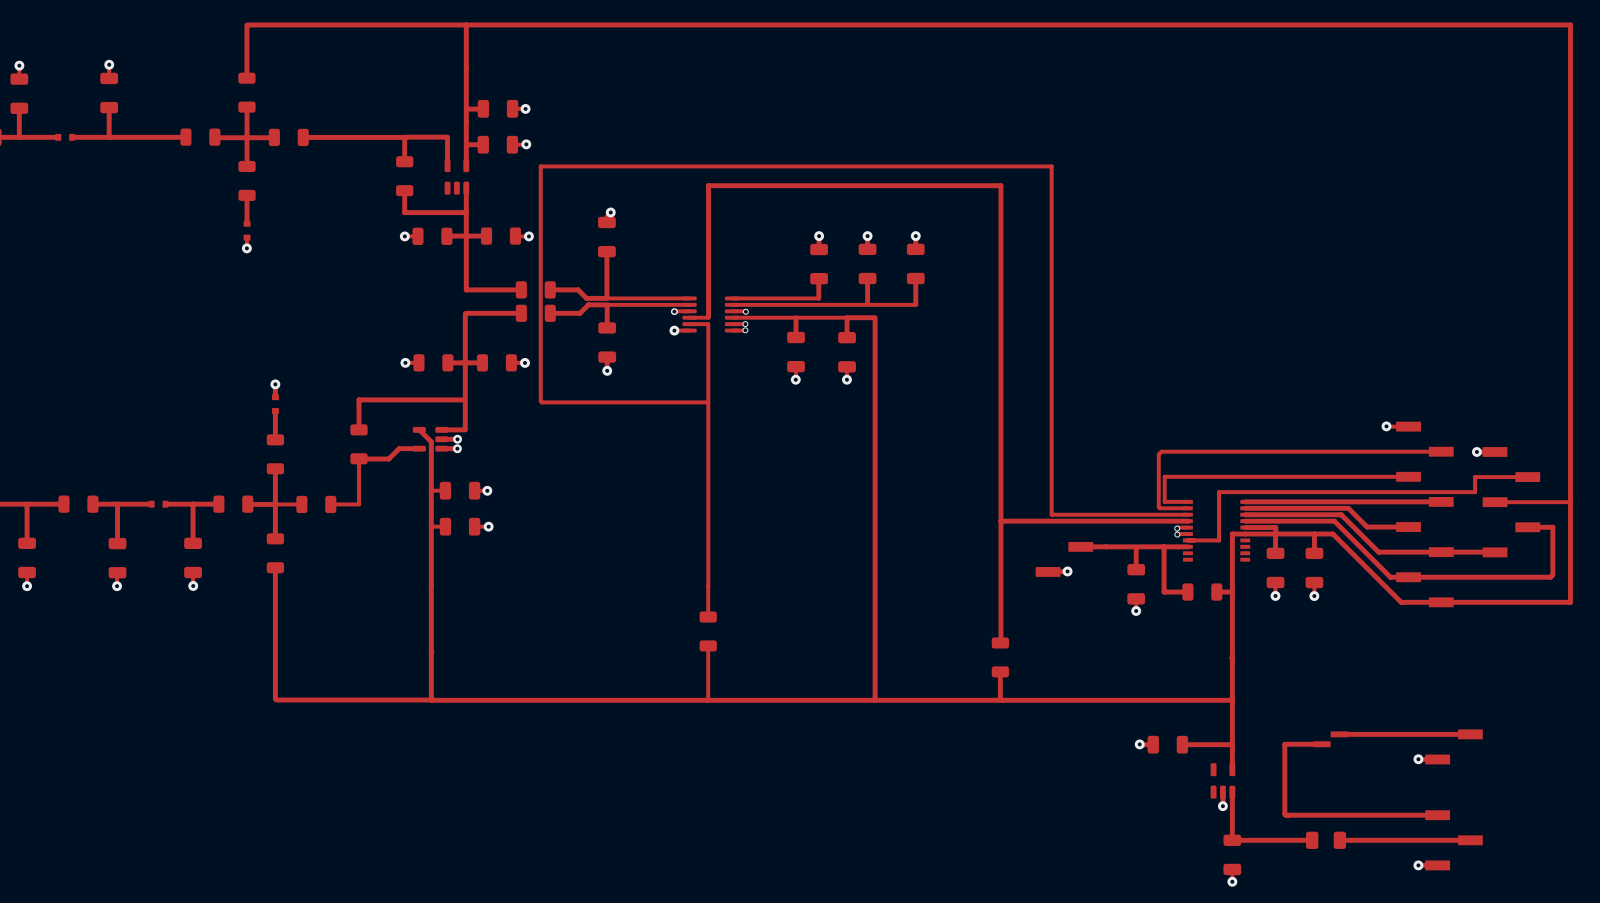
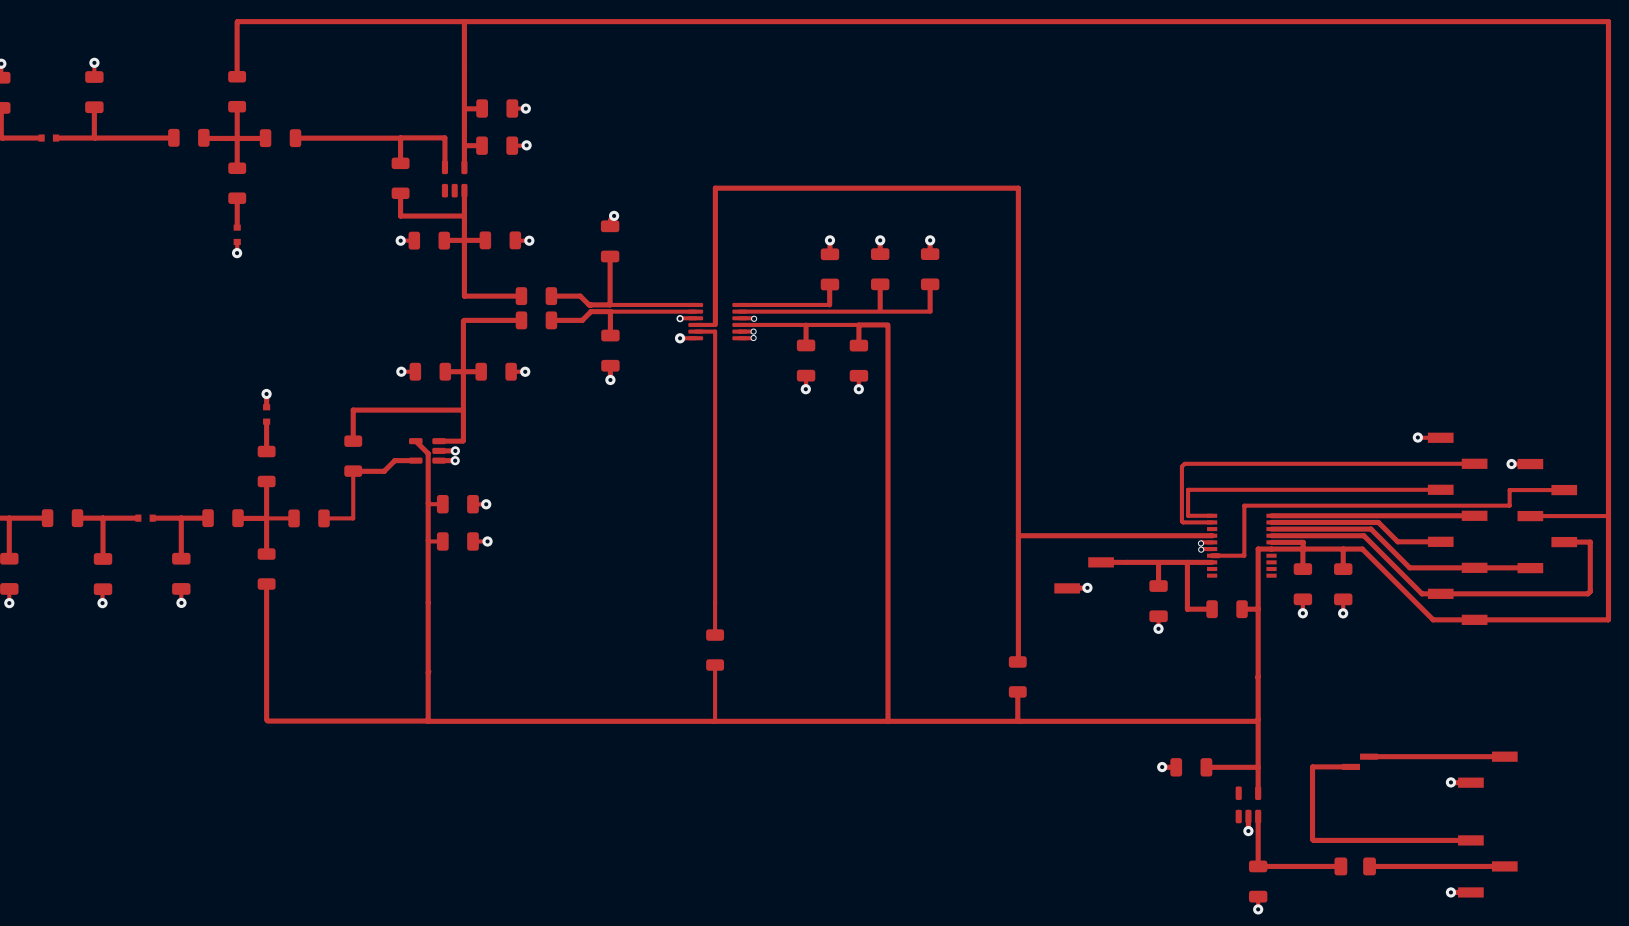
top track: (708, 402) (540, 400) (540, 166) (1051, 166) (1051, 514) (1187, 514) -> none

